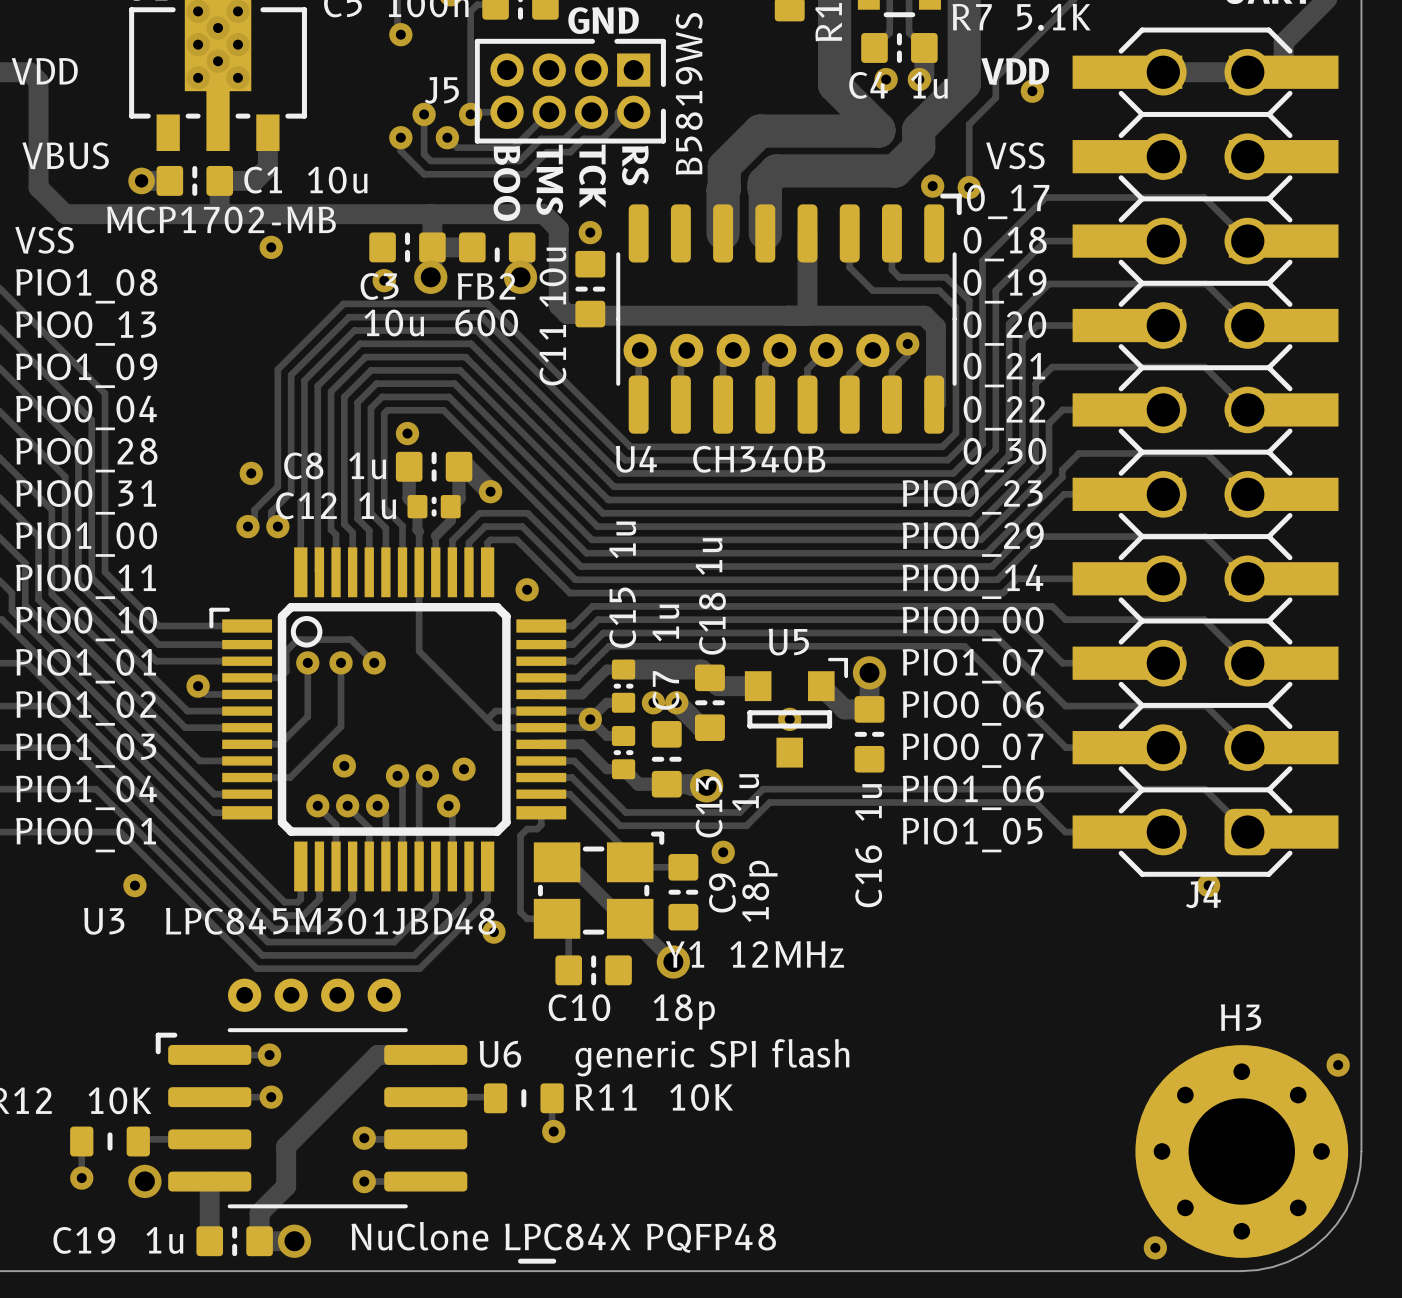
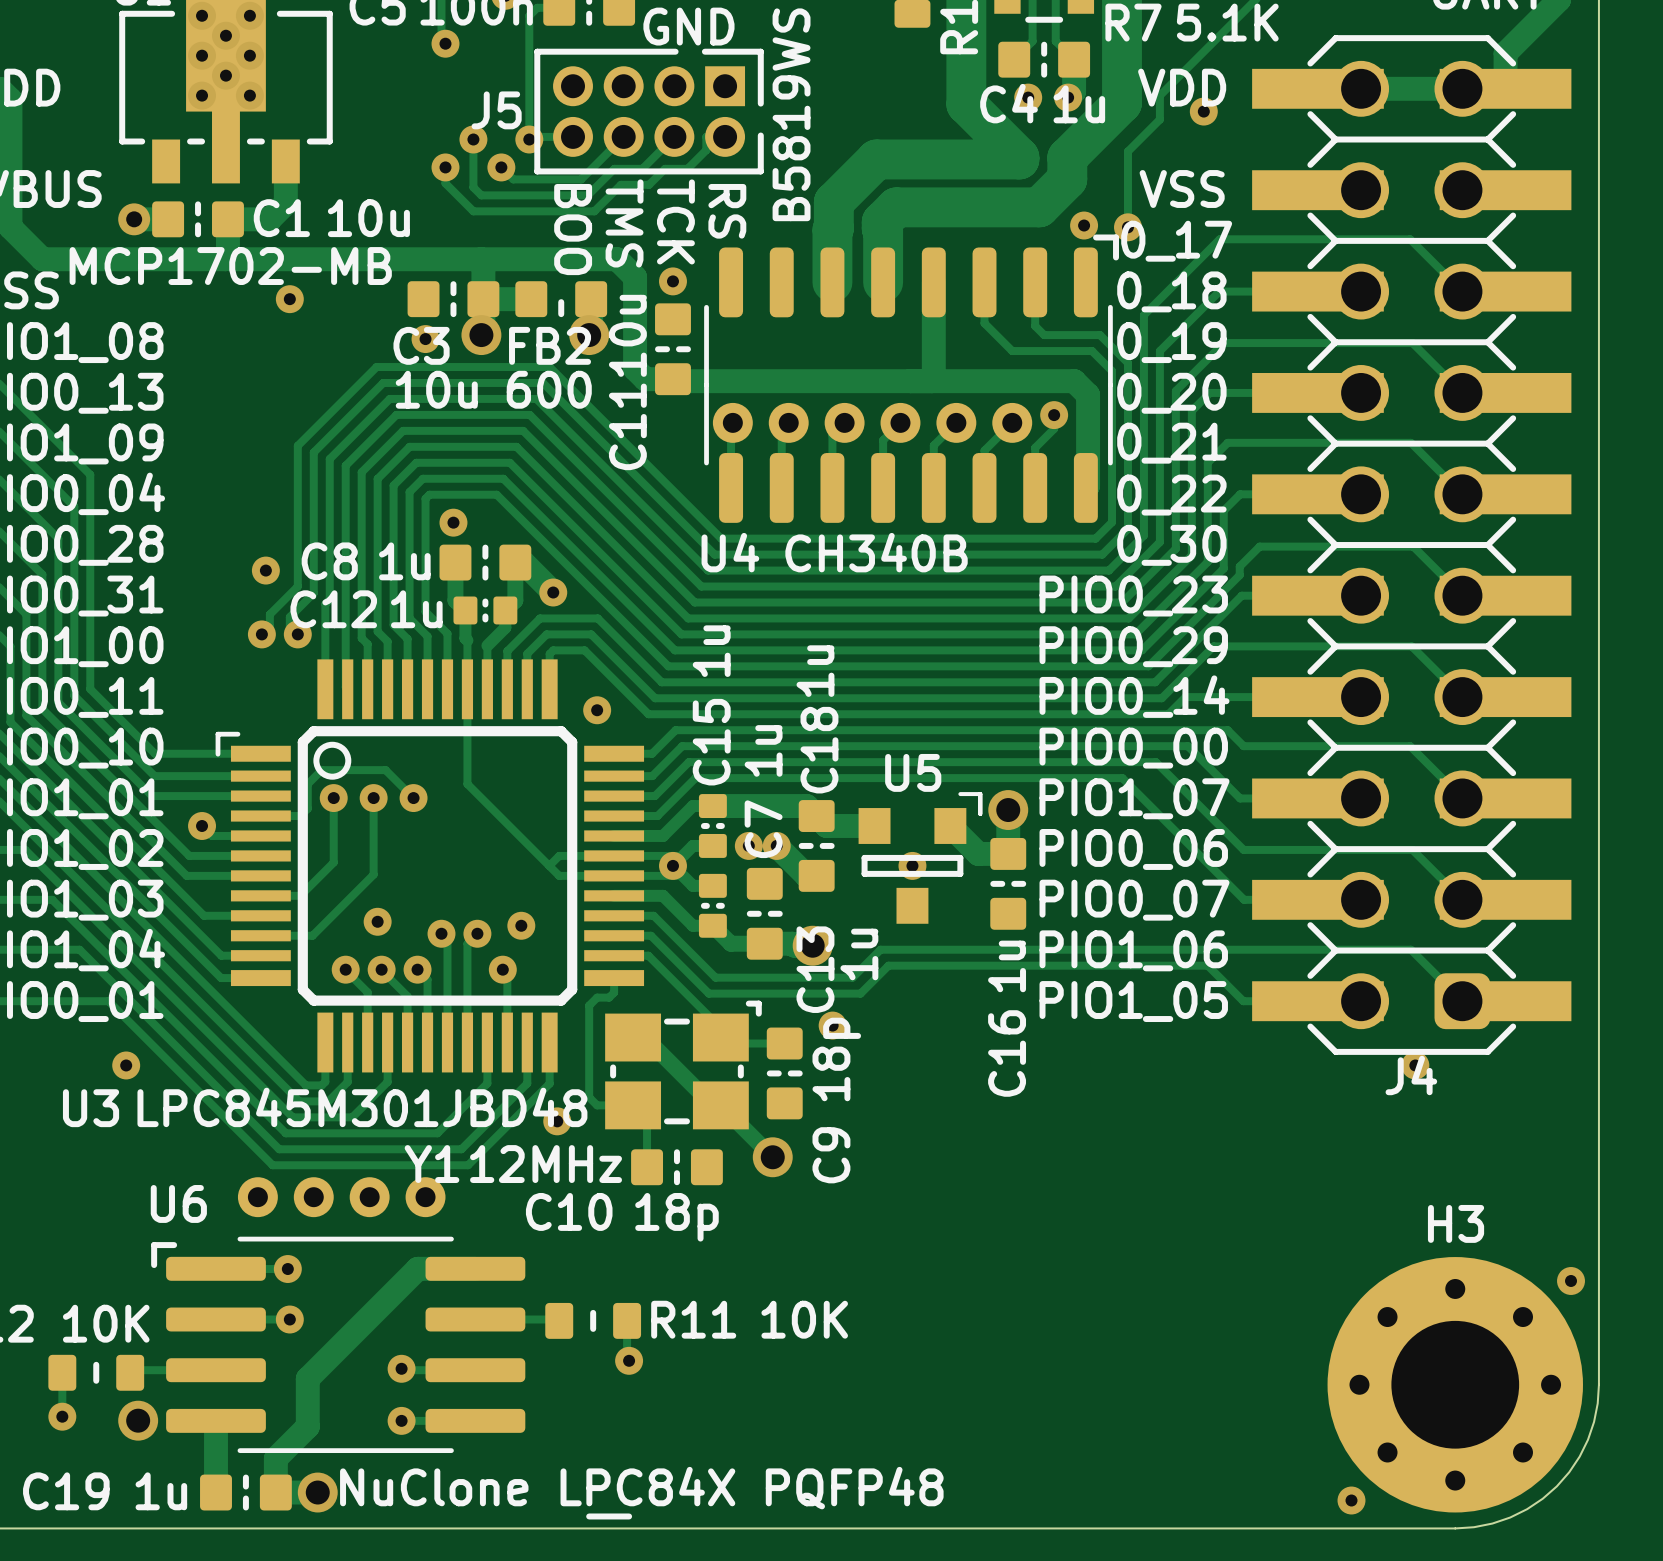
C9 value position: 18p (759, 891) -> 18p (836, 1059)
C9 name position: C9 (722, 893) -> C9 (831, 1155)
Y1 name position: Y1 (685, 954) -> Y1 (431, 1164)
Y1 value position: 12MHz (787, 954) -> 12MHz (546, 1164)
C10 name position: C10 (579, 1007) -> C10 (569, 1211)
C10 value position: 18p (684, 1011) -> 18p (676, 1217)
U6 name position: U6 (500, 1054) -> U6 (178, 1203)
U6 value: generic SPI flash (712, 1057) -> none

